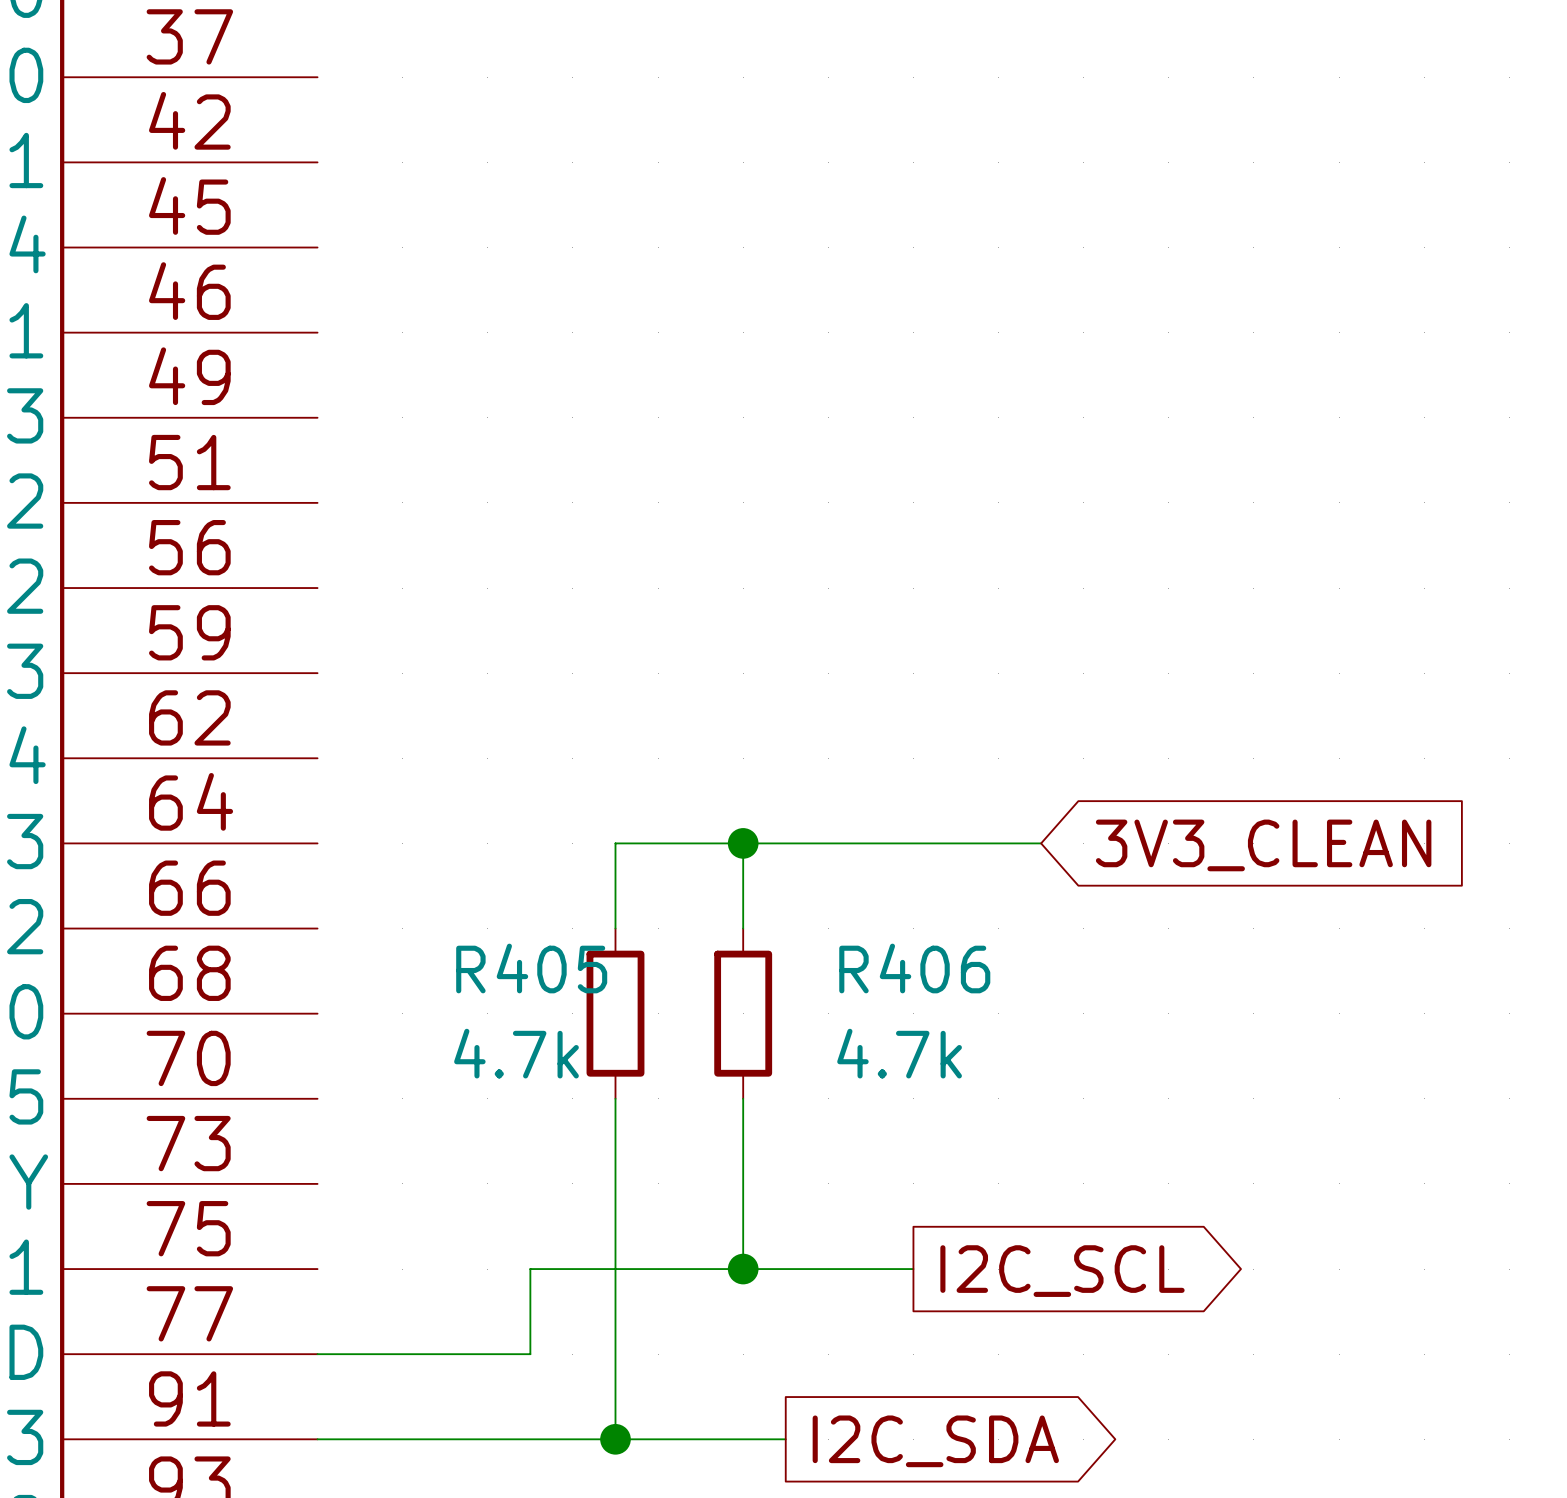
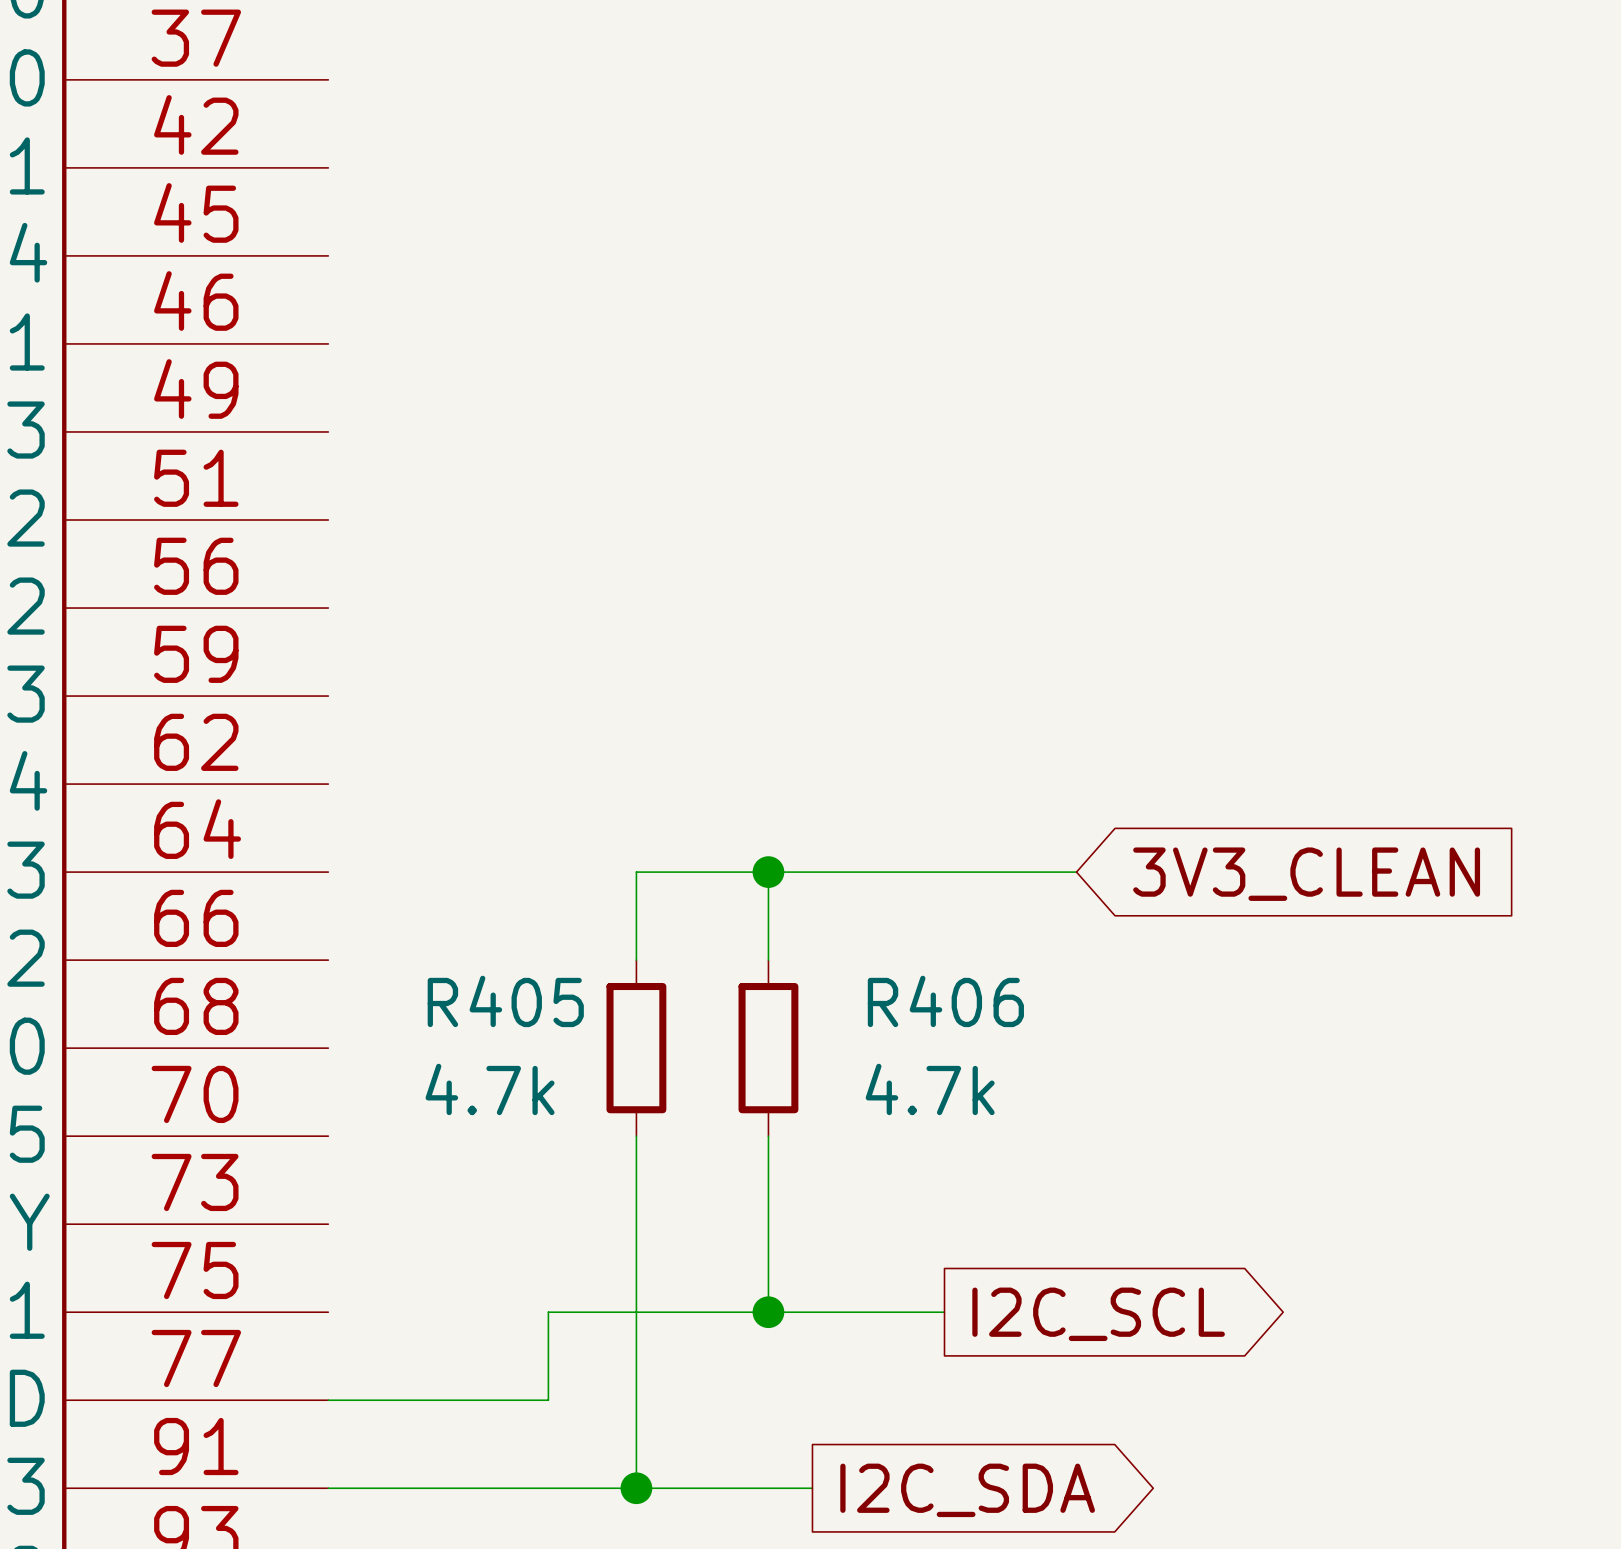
R405 name position: R405 (531, 968) -> R405 (505, 1001)
R405 value position: 4.7k (516, 1053) -> 4.7k (490, 1089)

